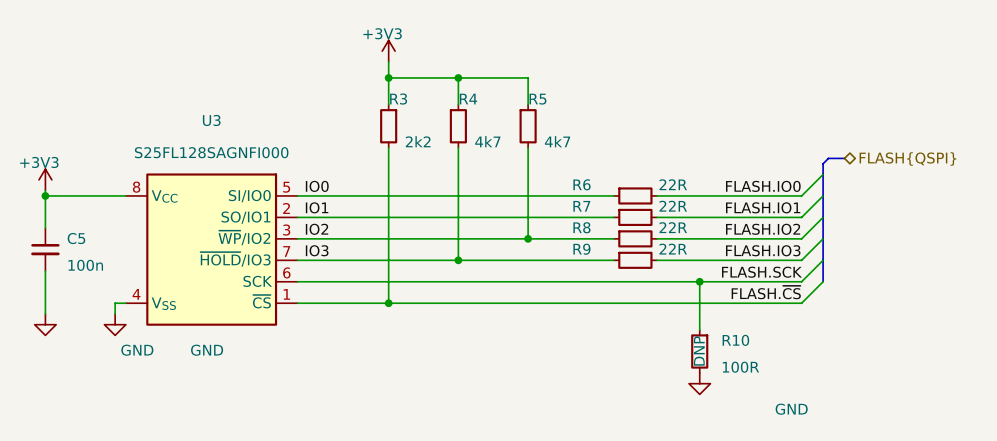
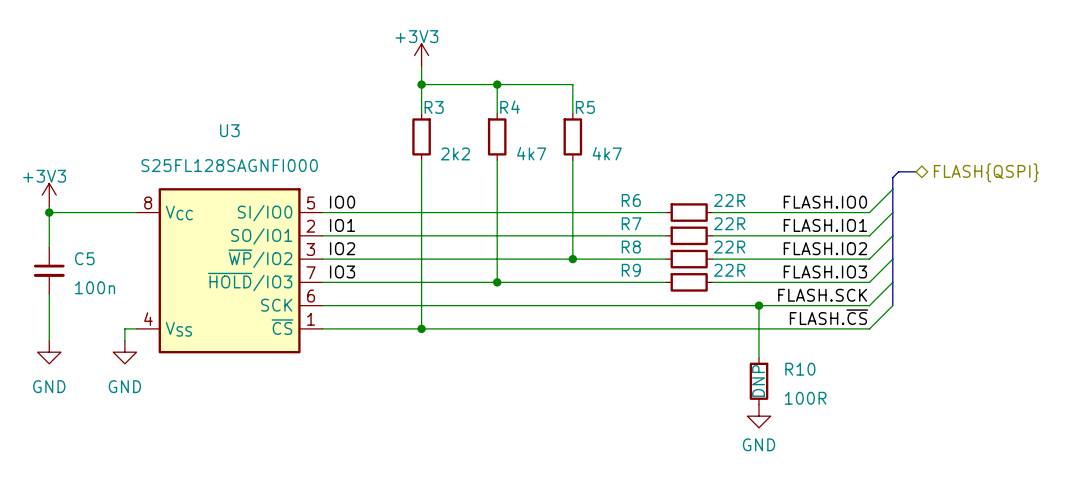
power symbol text position: GND (137, 350) -> GND (49, 386)
power symbol text position: GND (207, 350) -> GND (124, 386)
power symbol text position: GND (791, 409) -> GND (759, 444)

